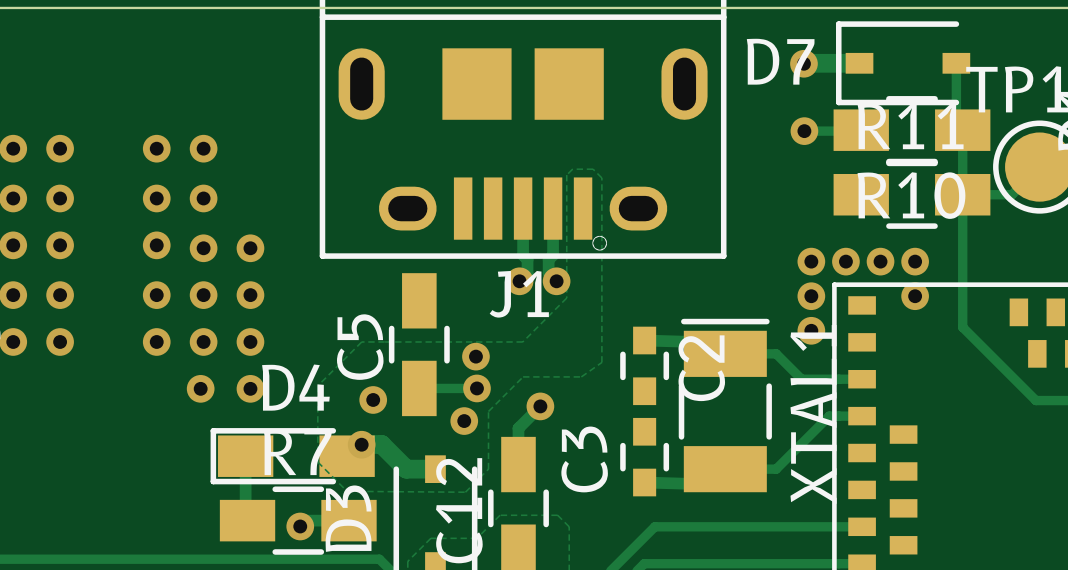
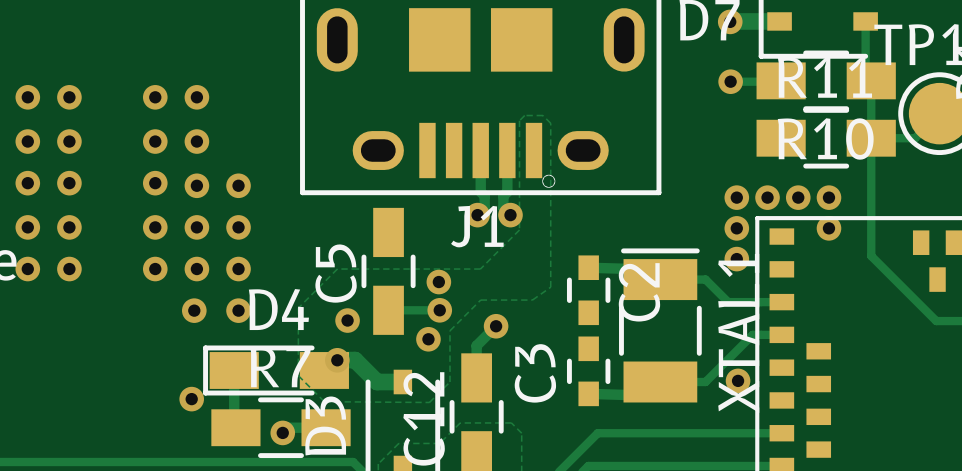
via: none -> (738, 380)
via: none -> (191, 399)

